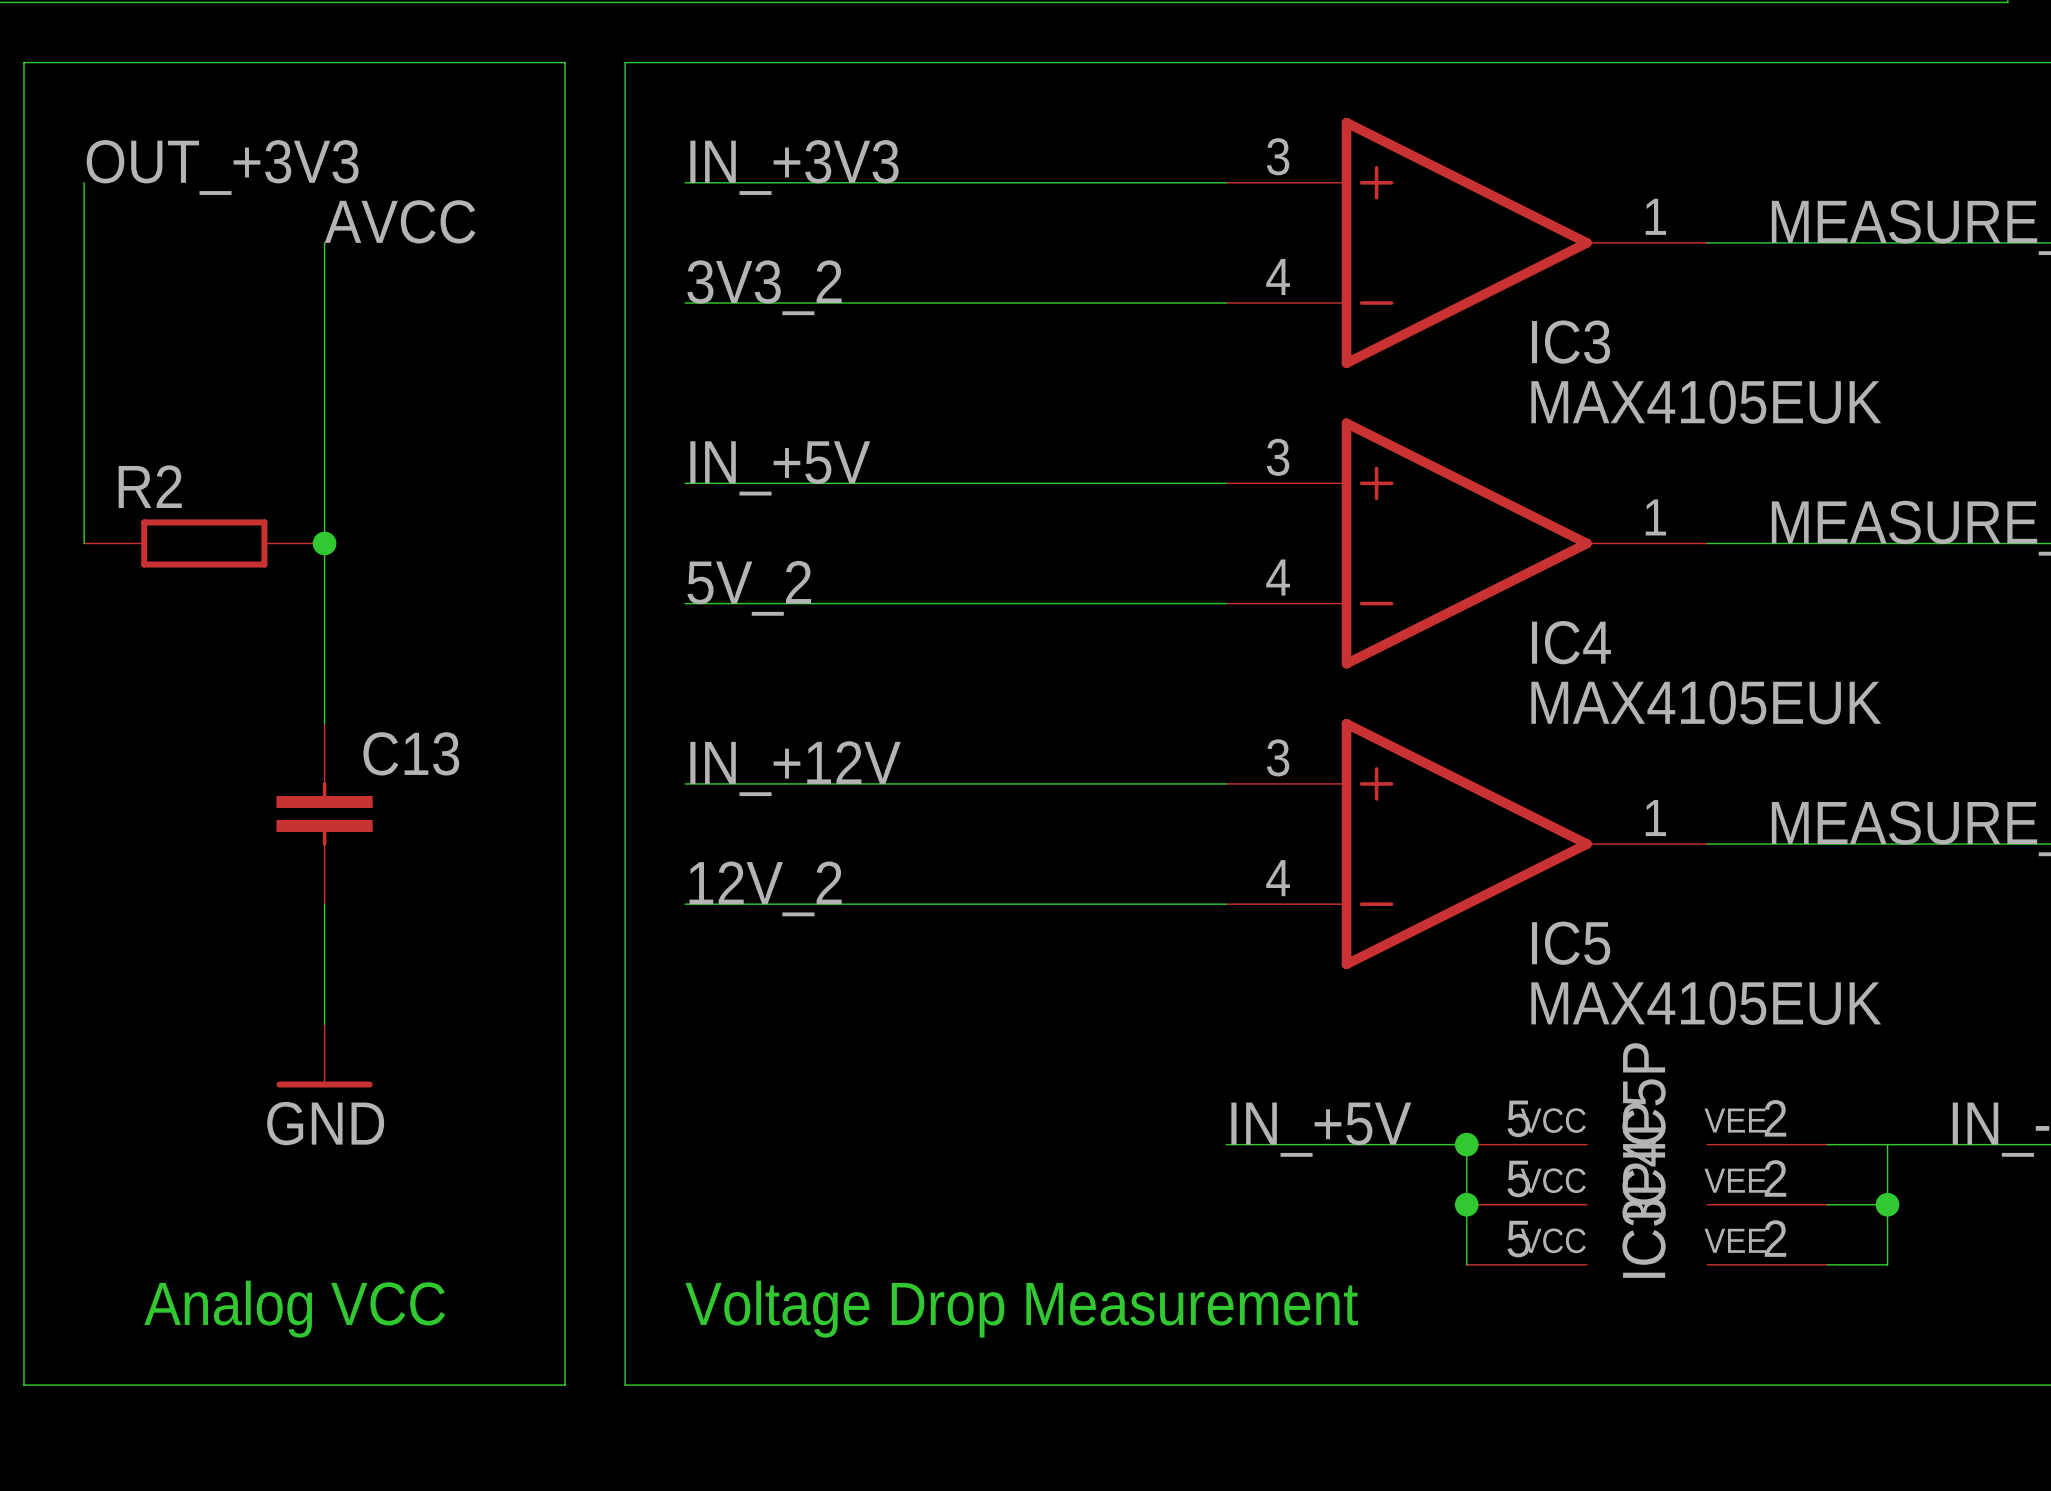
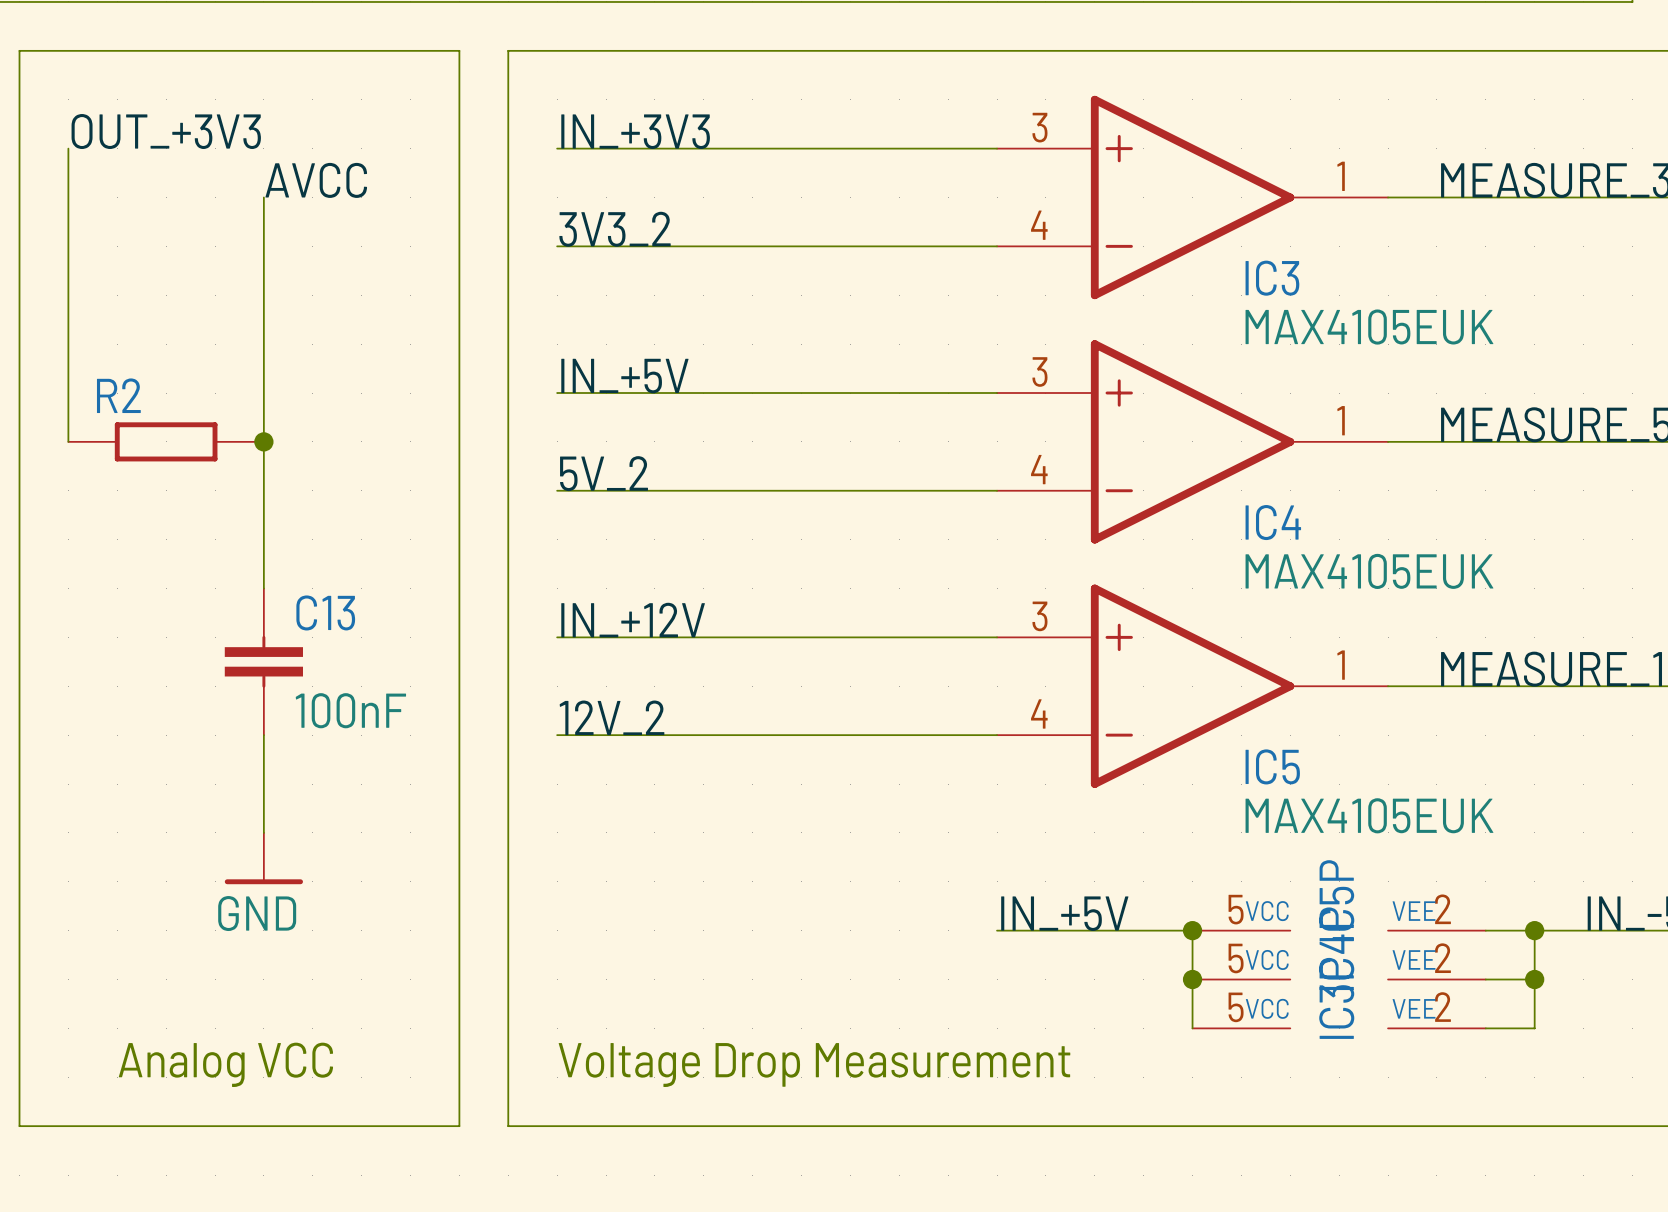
C13 value: none -> 100nF (350, 710)
junction: none -> (1534, 930)

